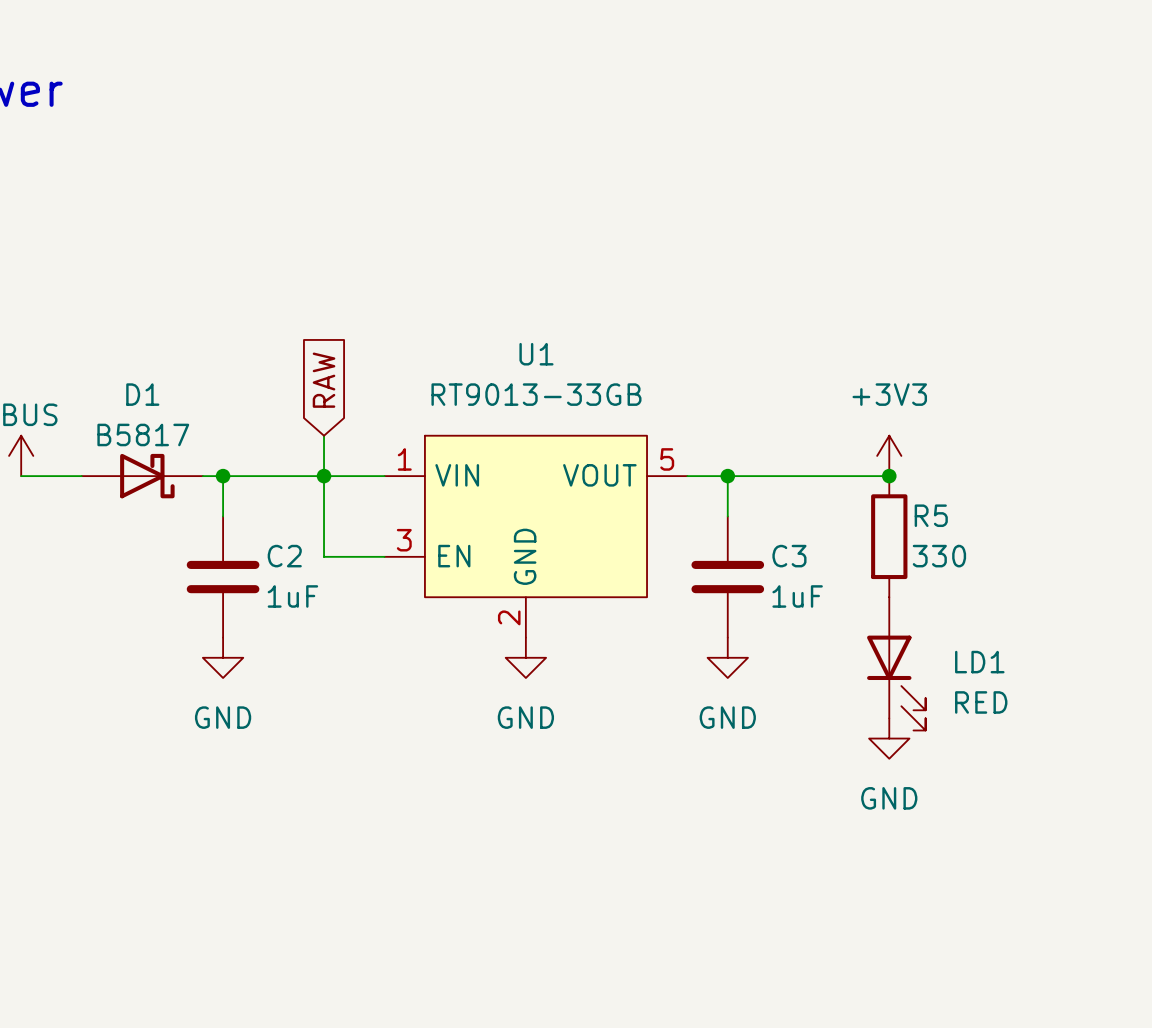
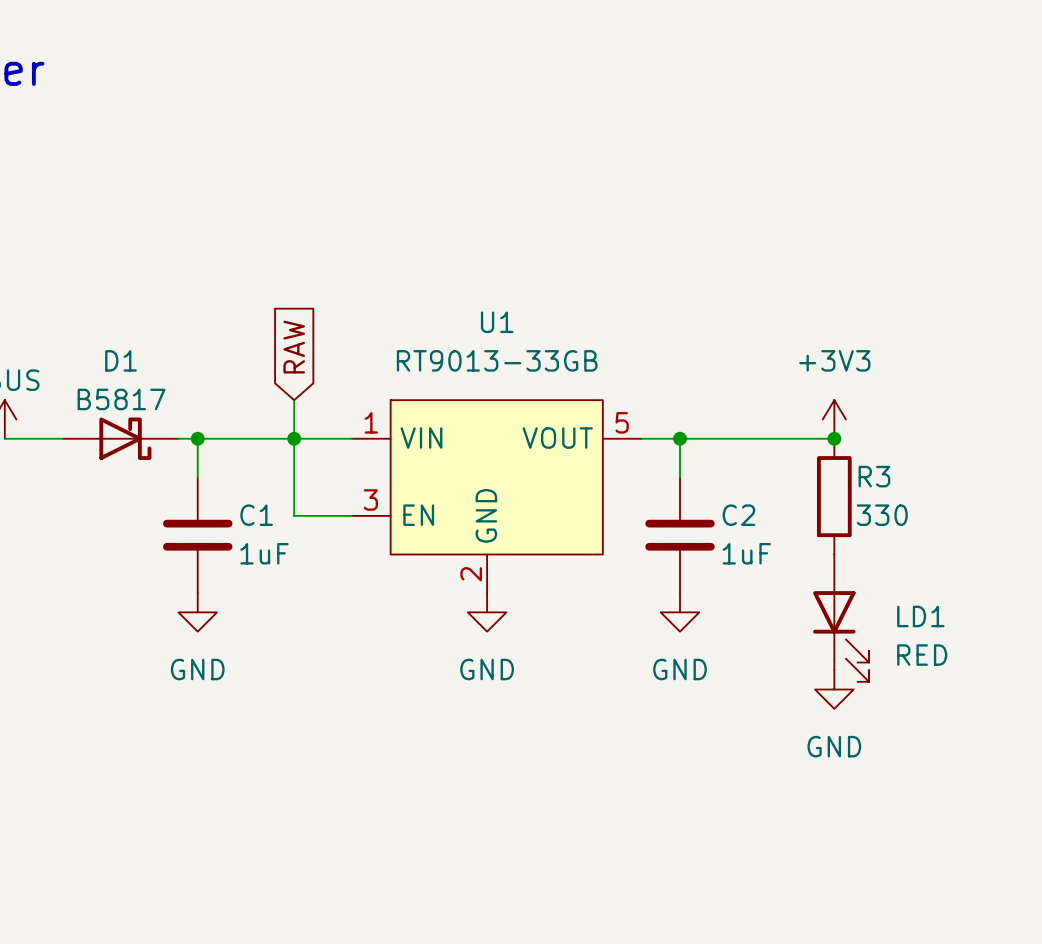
R5 name: R5 (931, 515) -> R3 (874, 476)
C2 name: C2 (284, 556) -> C1 (256, 515)
C3 name: C3 (789, 556) -> C2 (738, 515)

